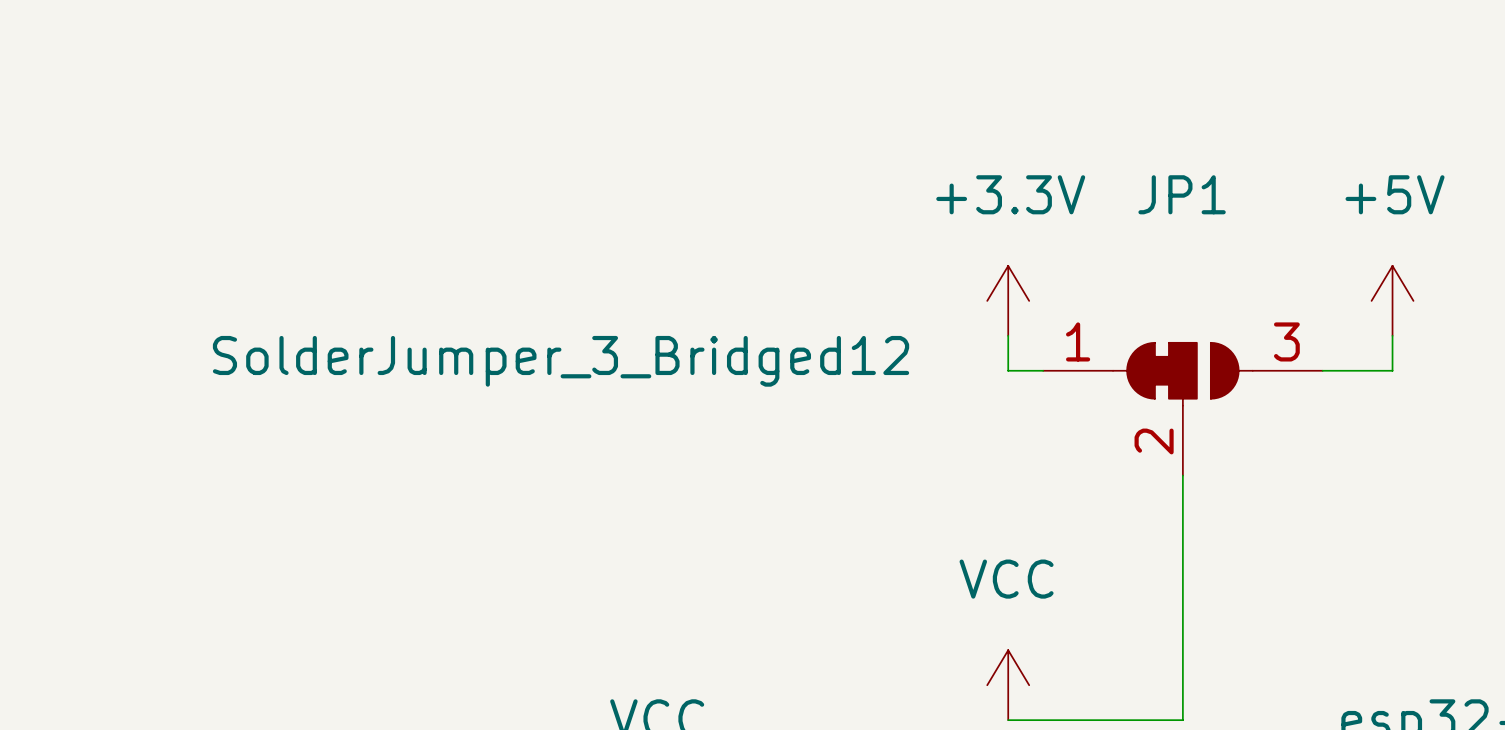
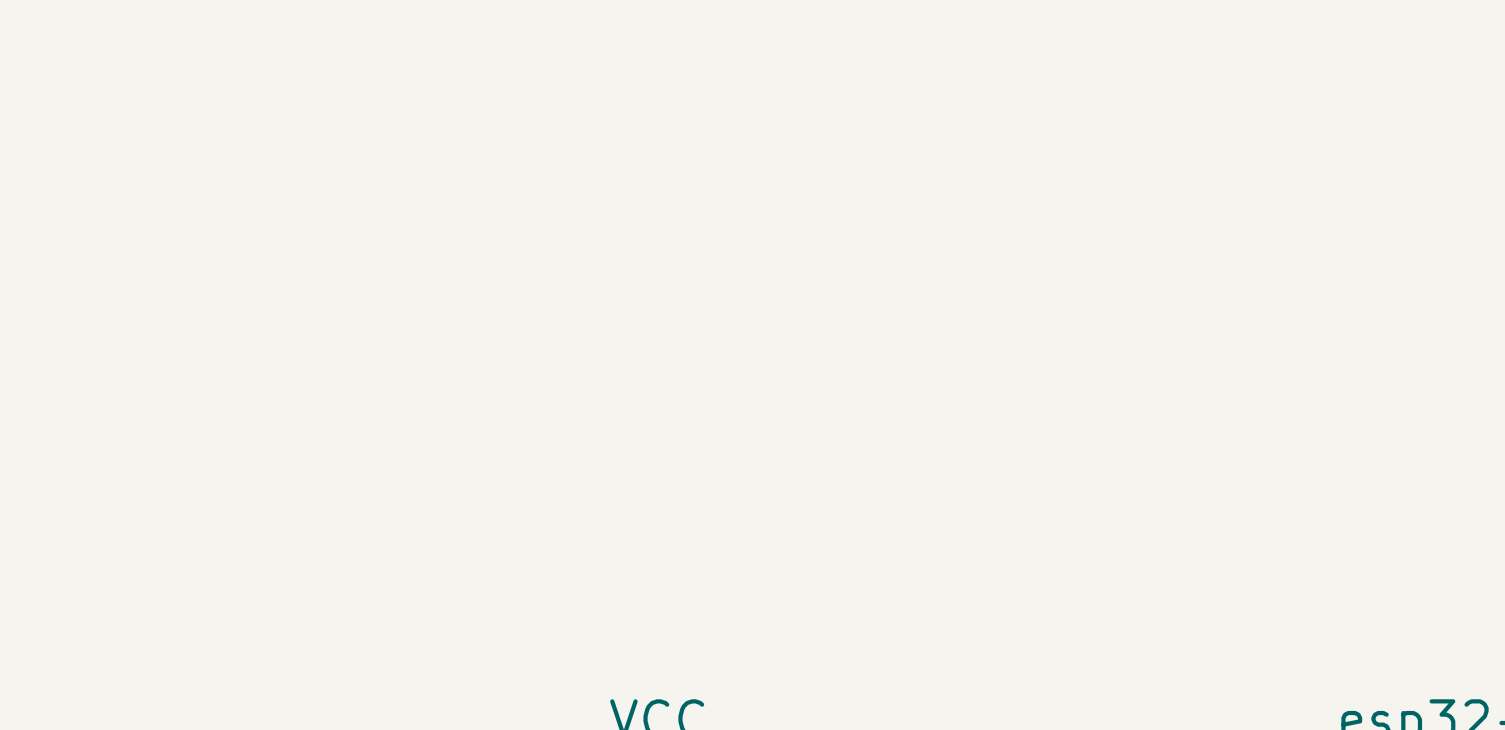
power symbol: +3.3V (1008, 300) -> none
power symbol: +5V (1392, 300) -> none
wire: (1008, 335) (1008, 370) (1043, 370) -> none
wire: (1392, 335) (1392, 370) (1322, 370) -> none
JP1: SolderJumper_3_Bridged12 (1182, 409) -> none
wire: (1182, 475) (1182, 720) (1008, 720) -> none
power symbol: VCC (1008, 685) -> none

